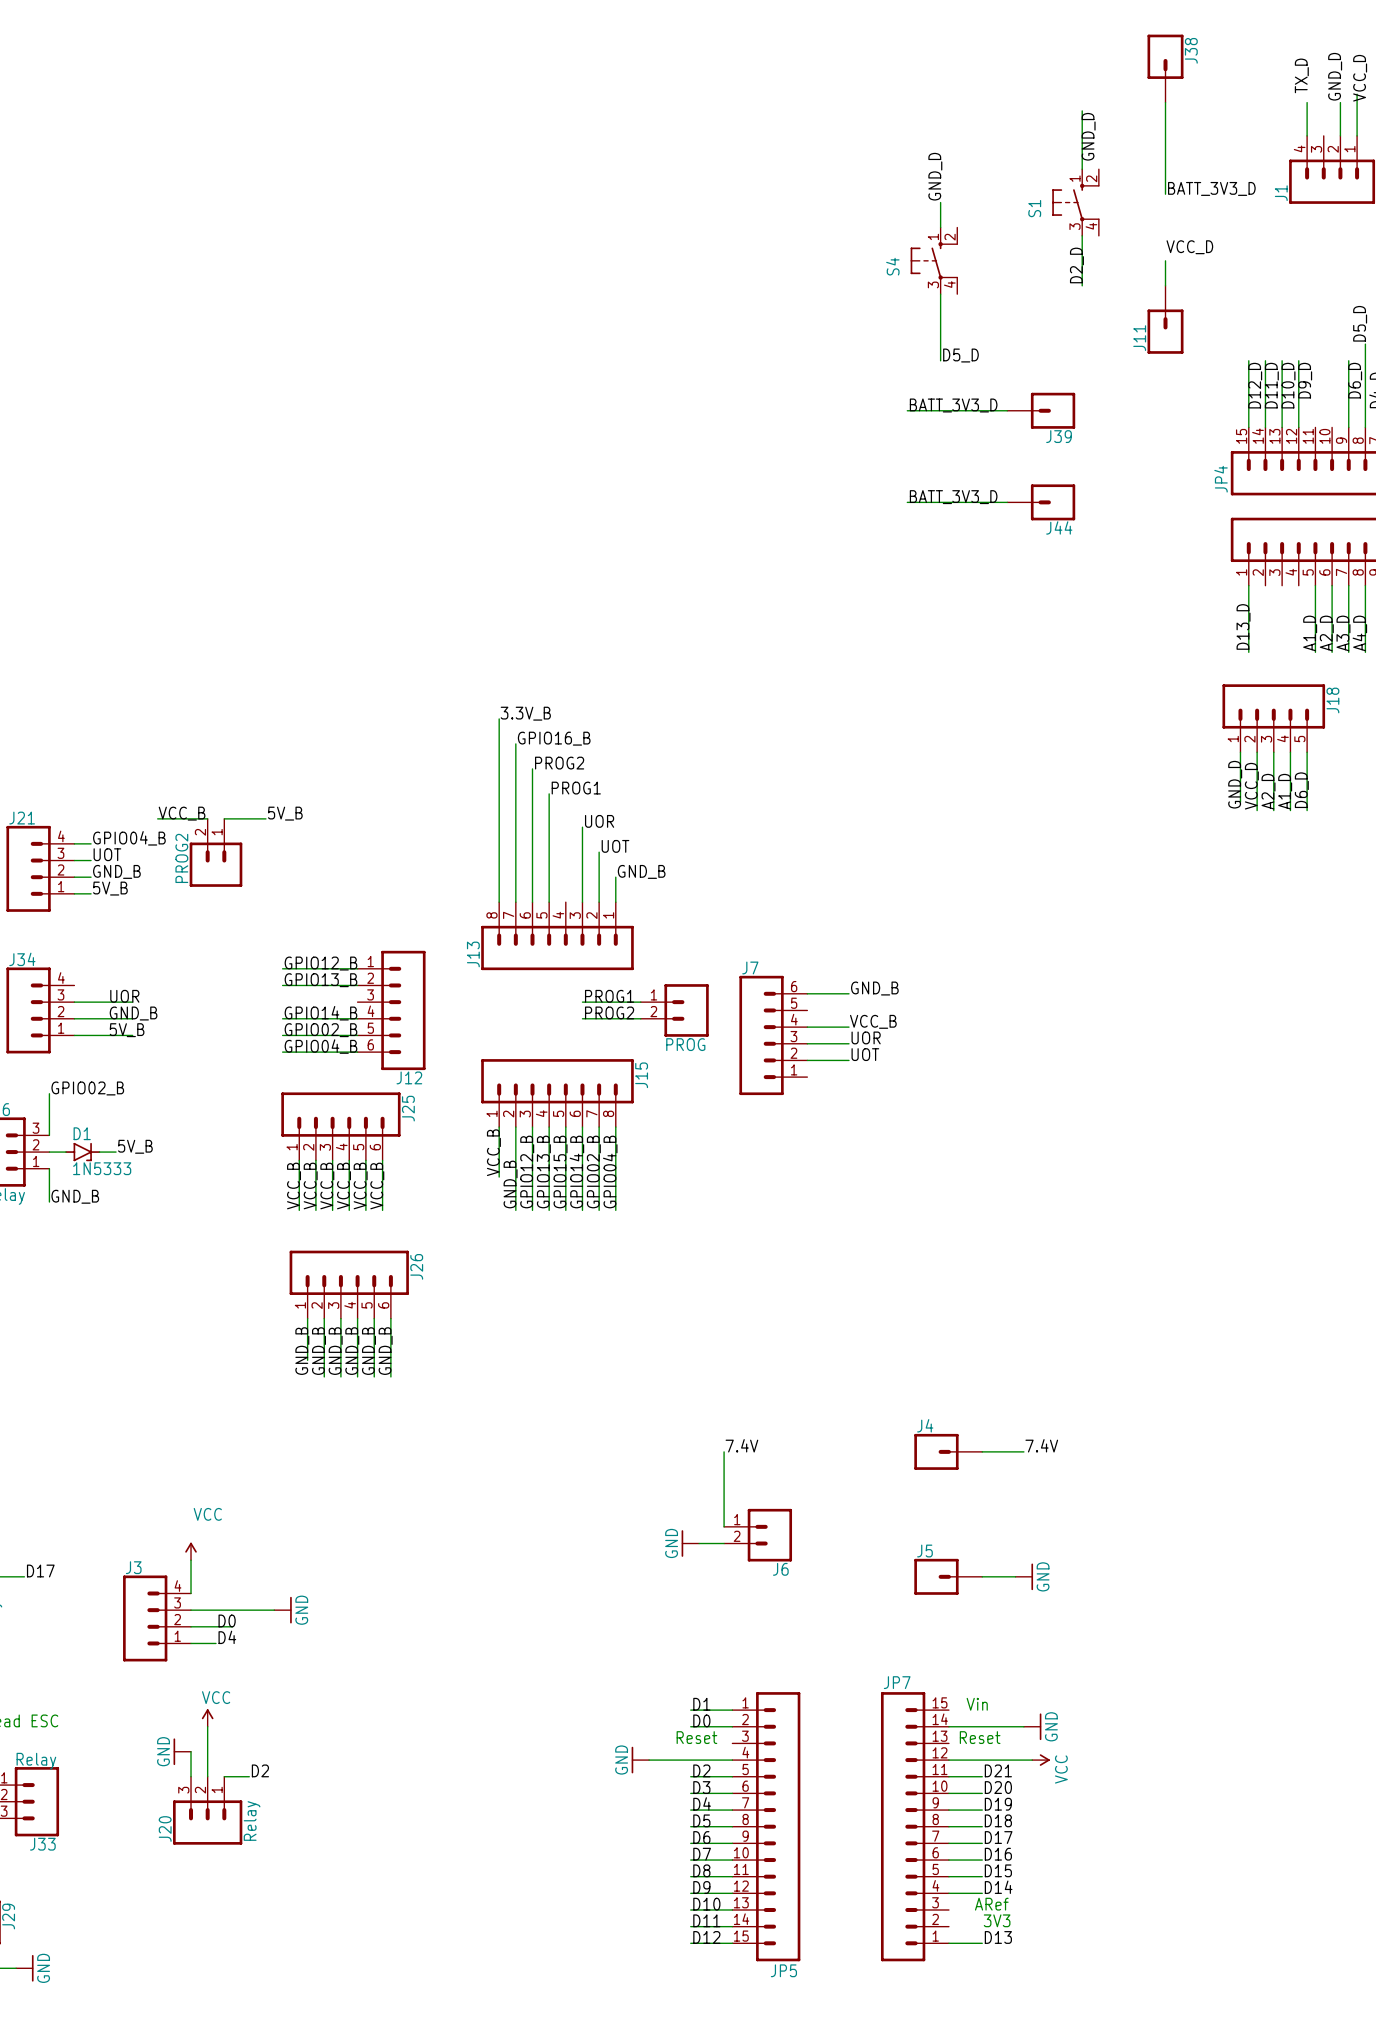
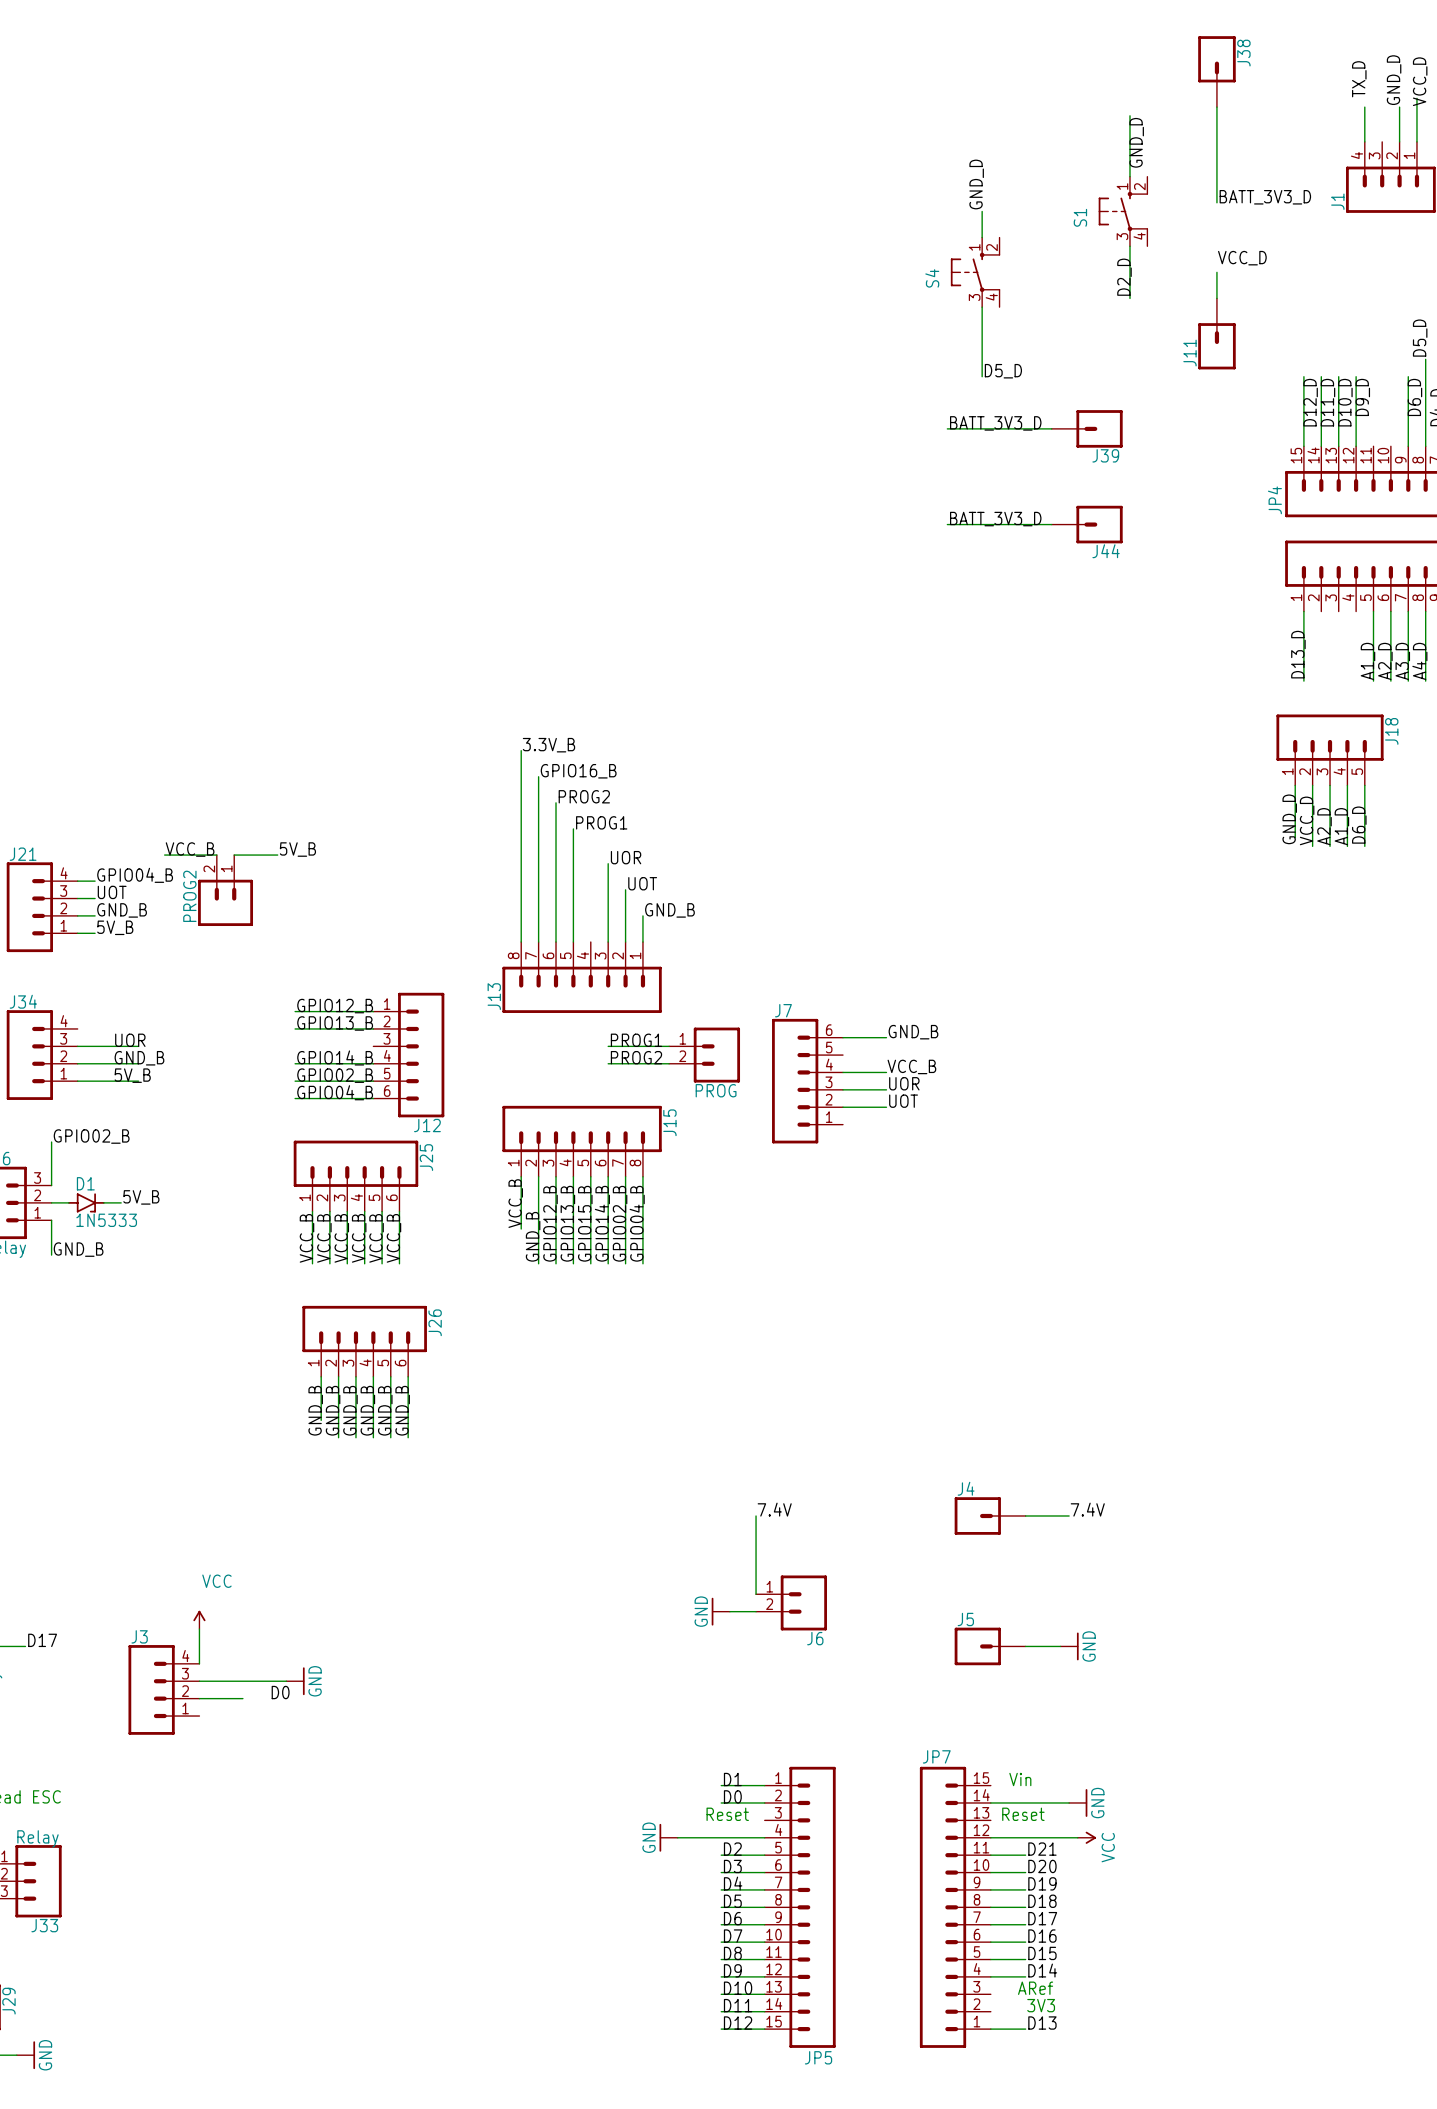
label position: D0 (227, 1620) -> D0 (280, 1692)
label: D4 (227, 1637) -> none
wire: (191, 1643) (215, 1643) -> none
power symbol: VCC (207, 1718) -> none
wire: (207, 1726) (207, 1776) -> none
power symbol: GND (182, 1751) -> none
wire: (191, 1751) (191, 1776) -> none
label: D2 (260, 1770) -> none
wire: (224, 1776) (249, 1776) -> none
J20: Relay (207, 1810) -> none

